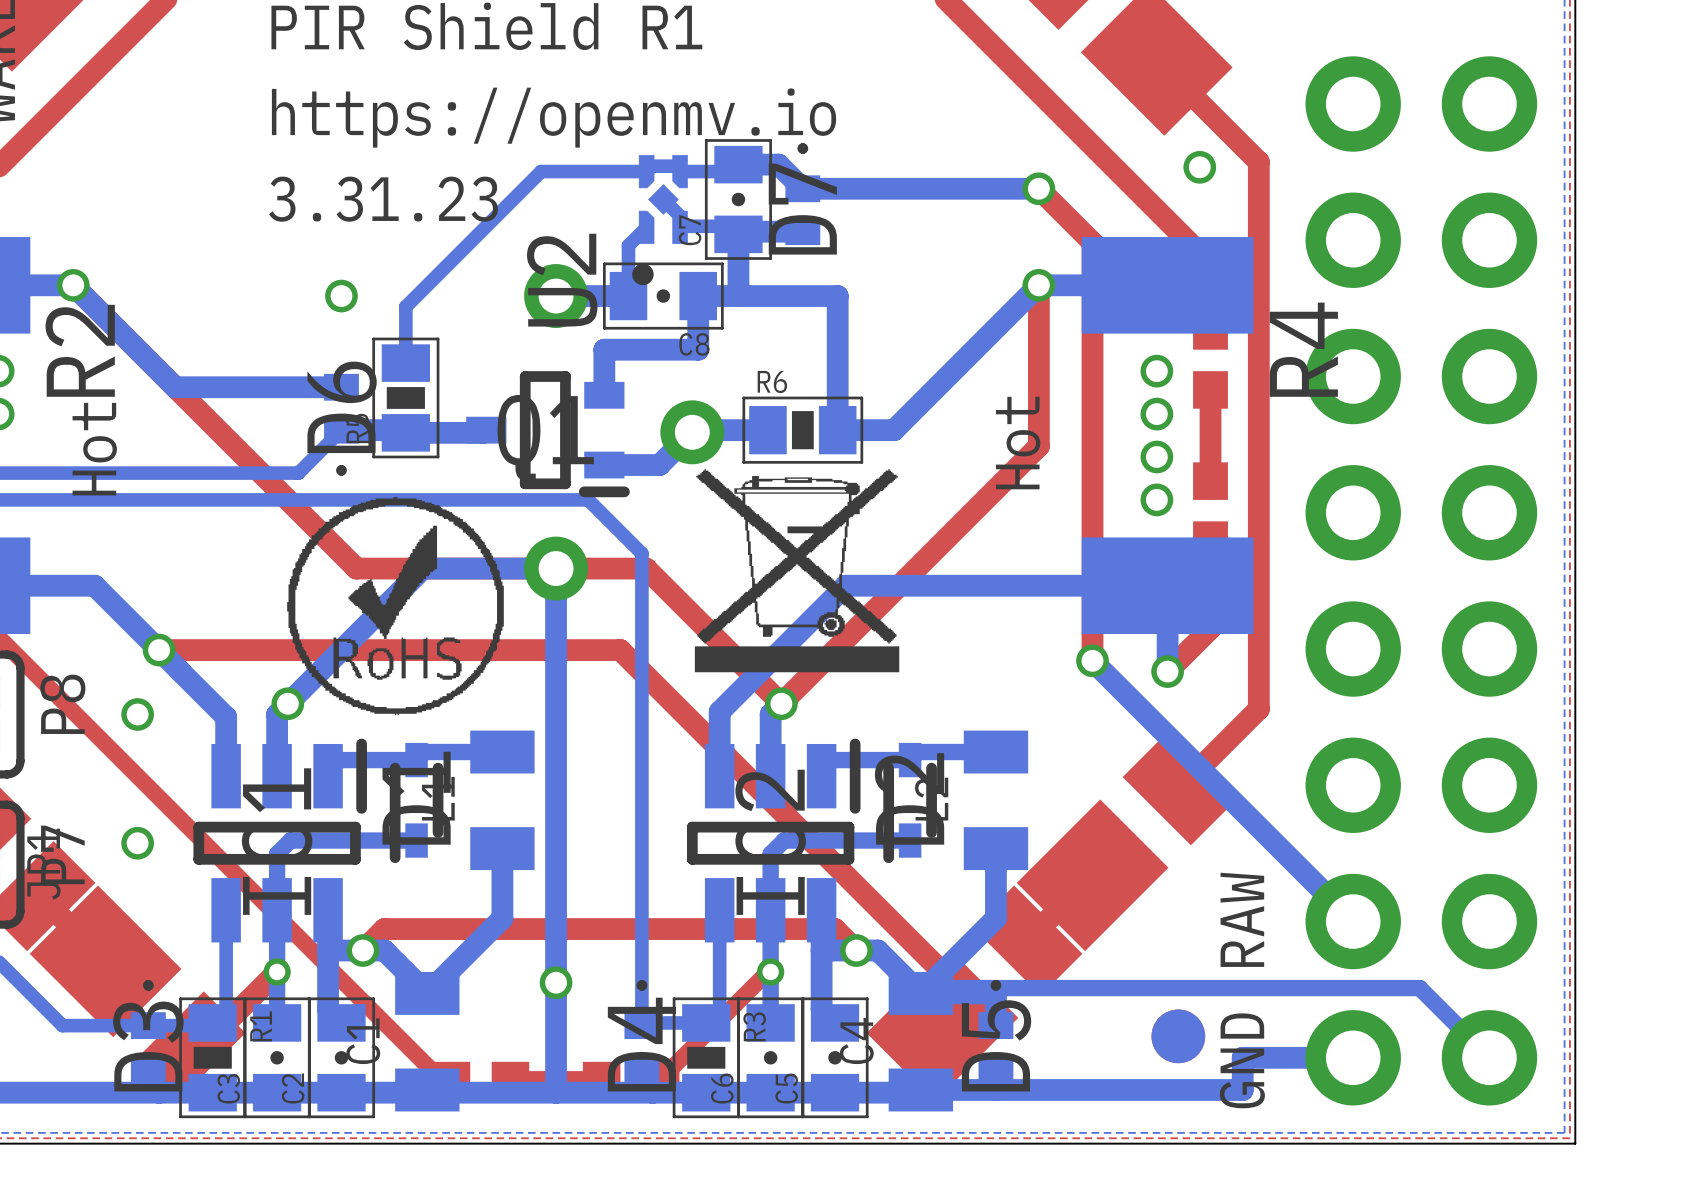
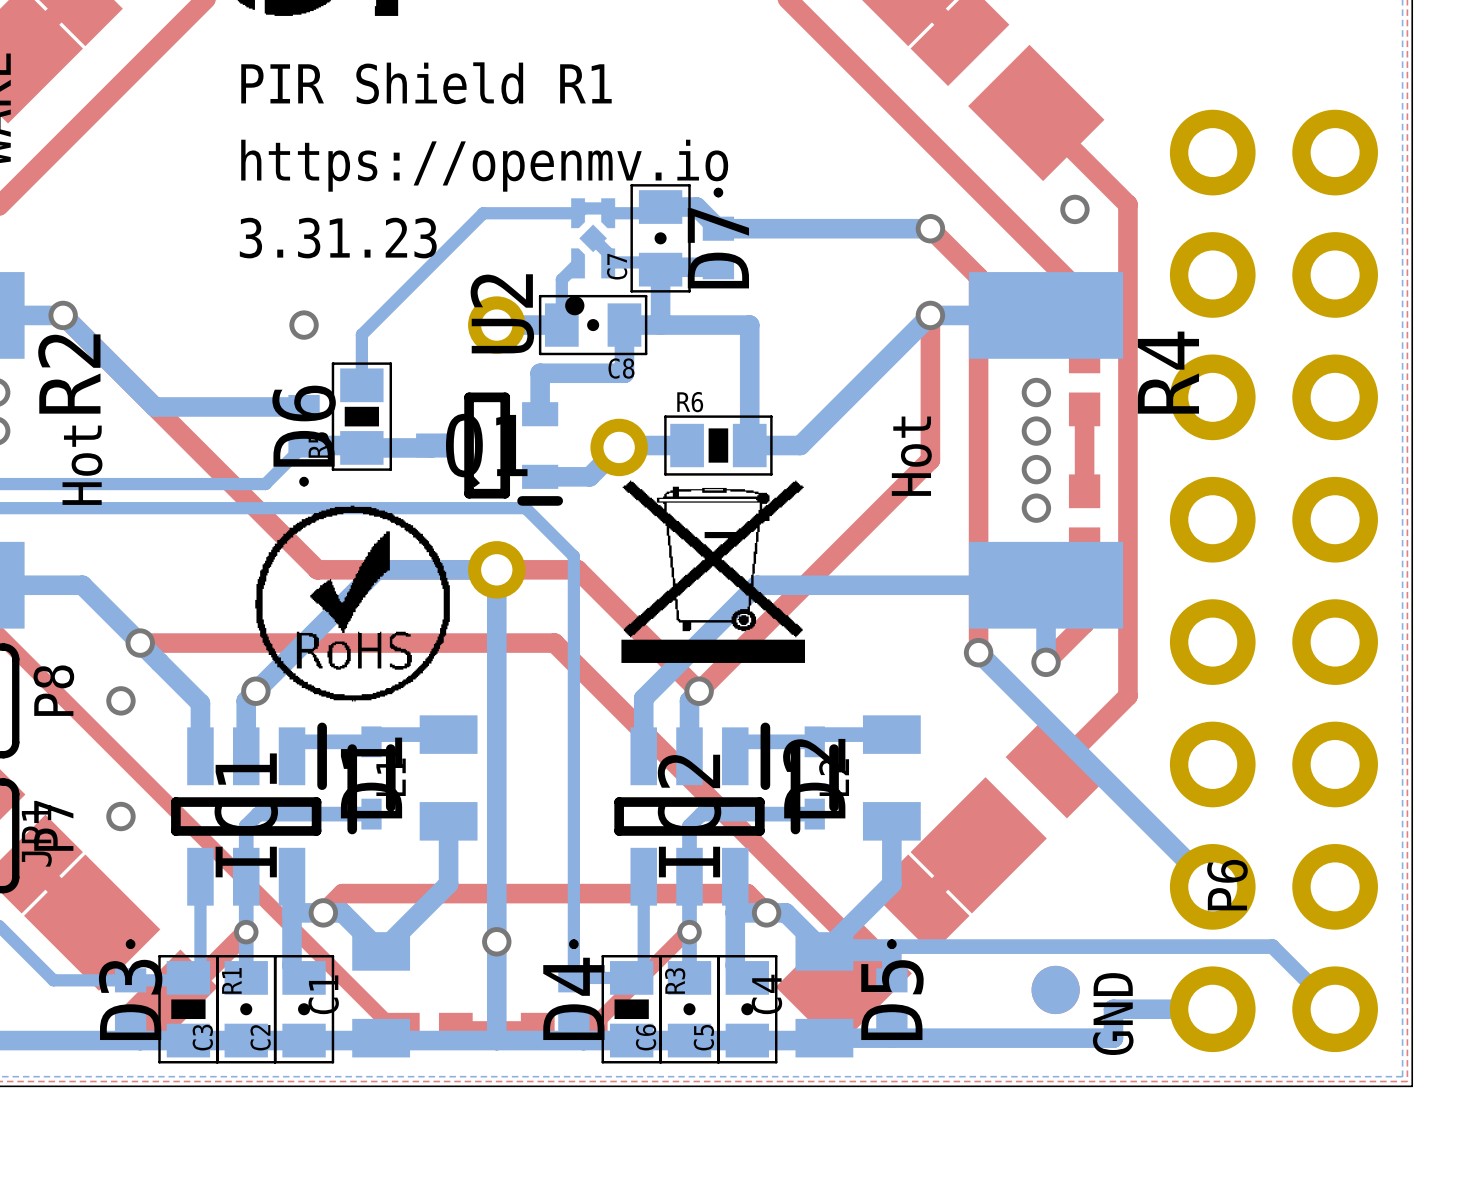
text: none -> P6 (1227, 885)
text: RAW (1242, 919) -> none

